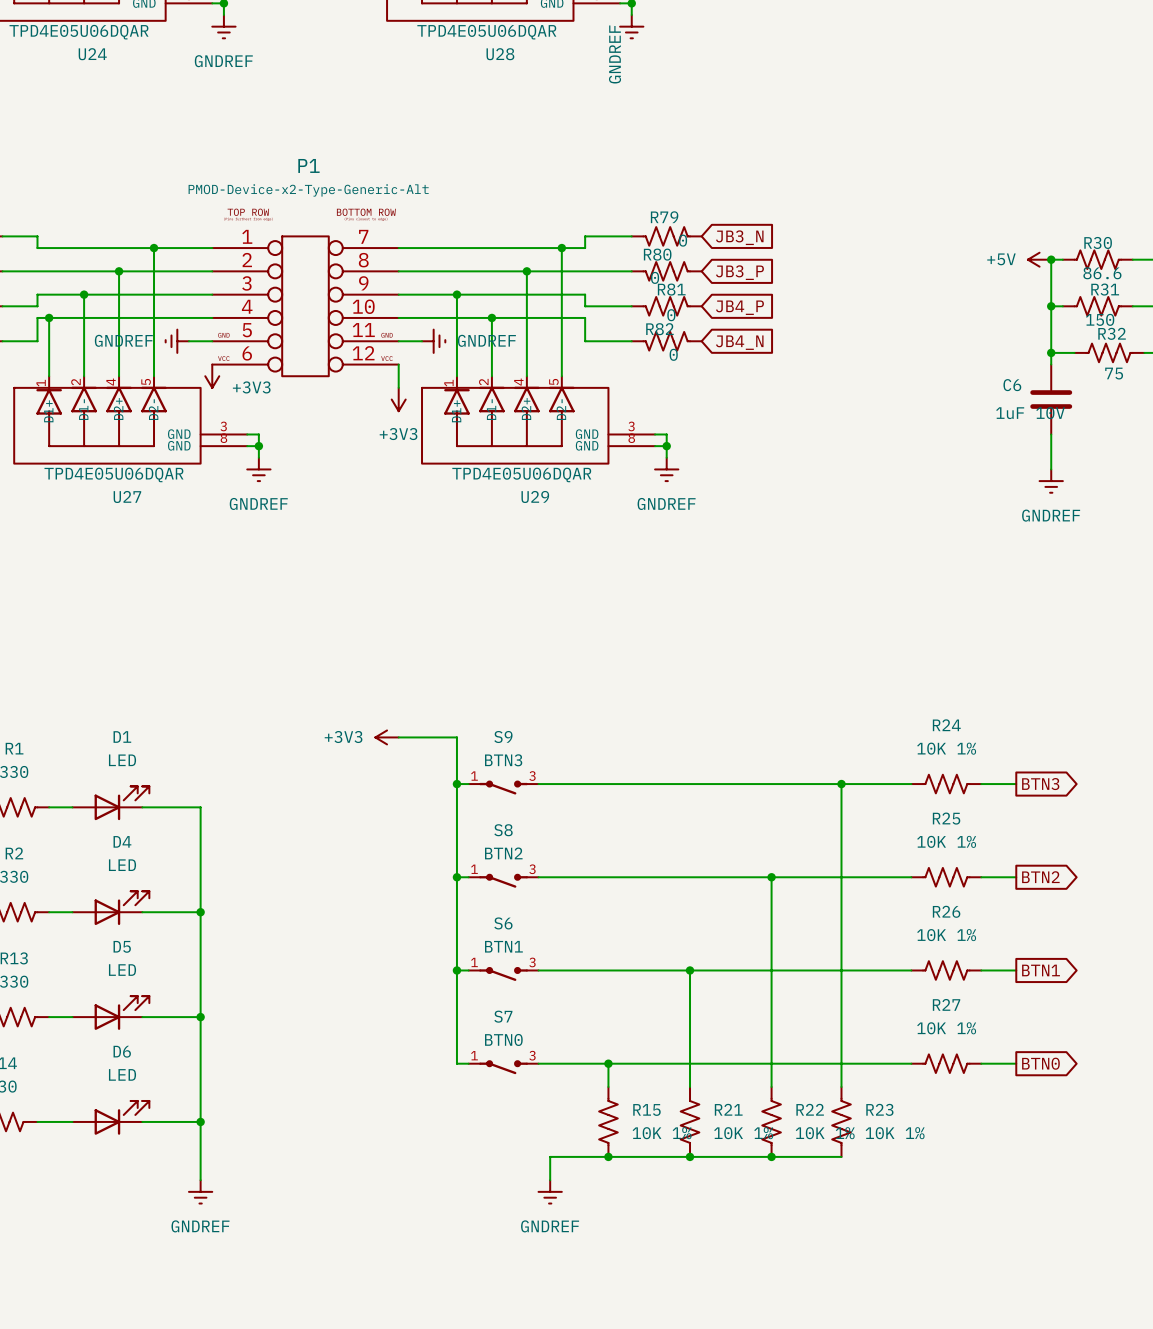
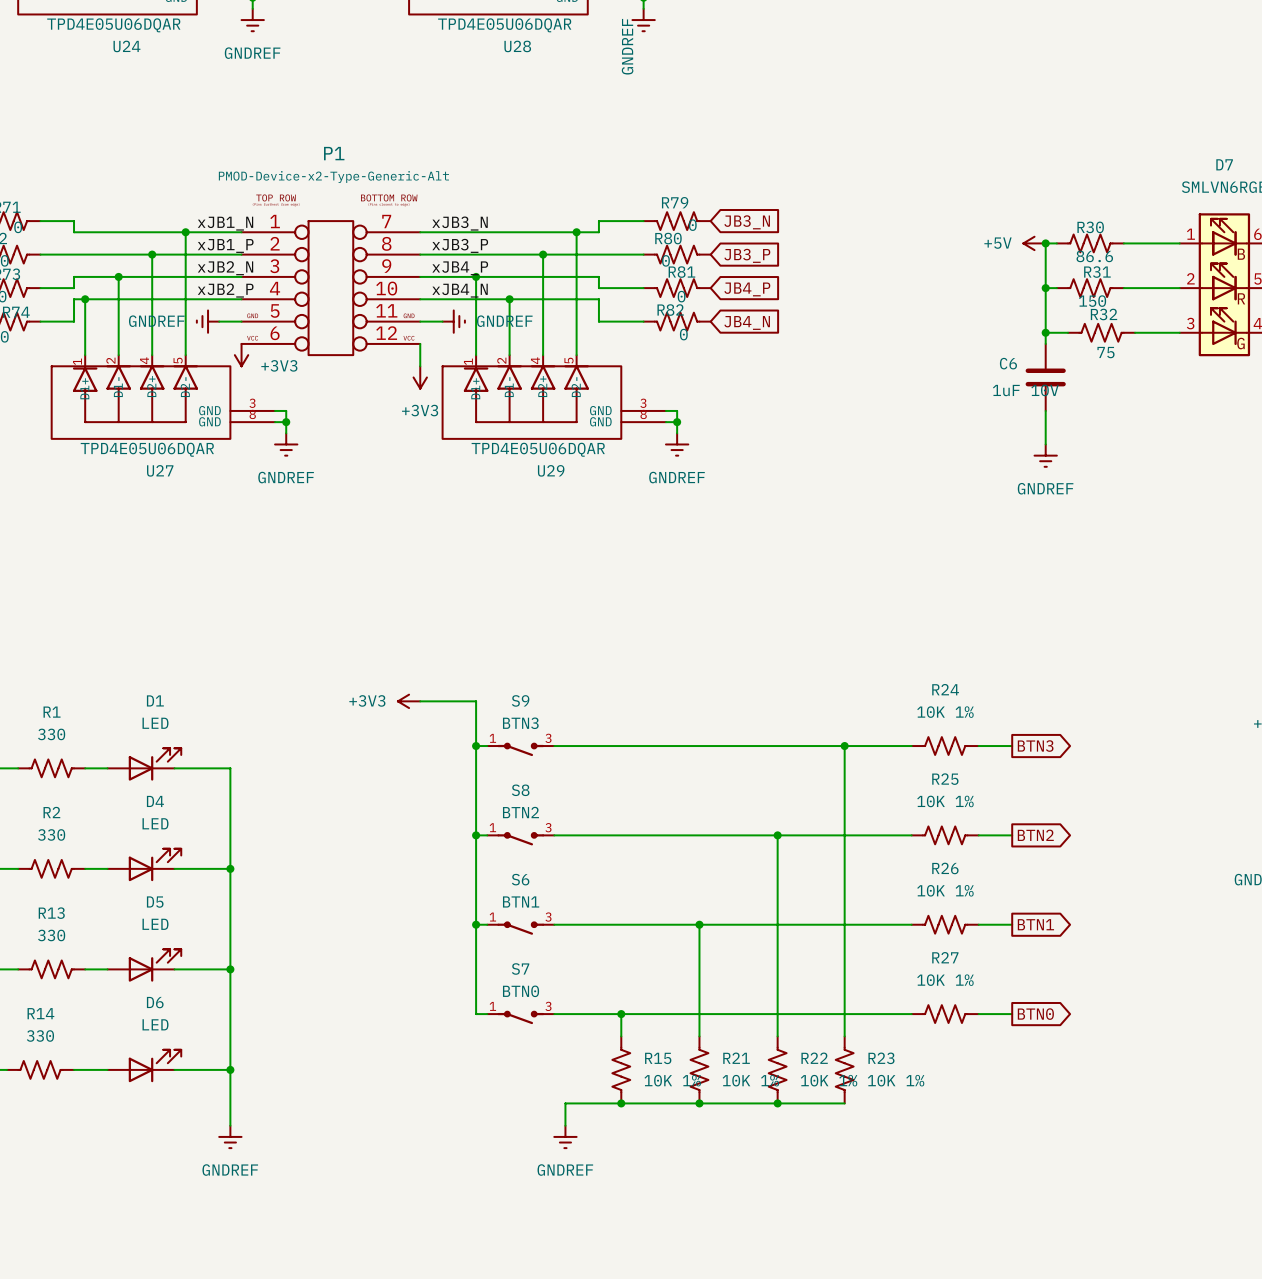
label: none -> xJB3_N (460, 223)
label: none -> xJB1_N (225, 223)
label: none -> xJB1_P (225, 245)
label: none -> xJB3_P (460, 245)
label: none -> xJB2_N (225, 268)
label: none -> xJB4_P (460, 268)
label: none -> xJB2_P (225, 290)
label: none -> xJB4_N (460, 290)

